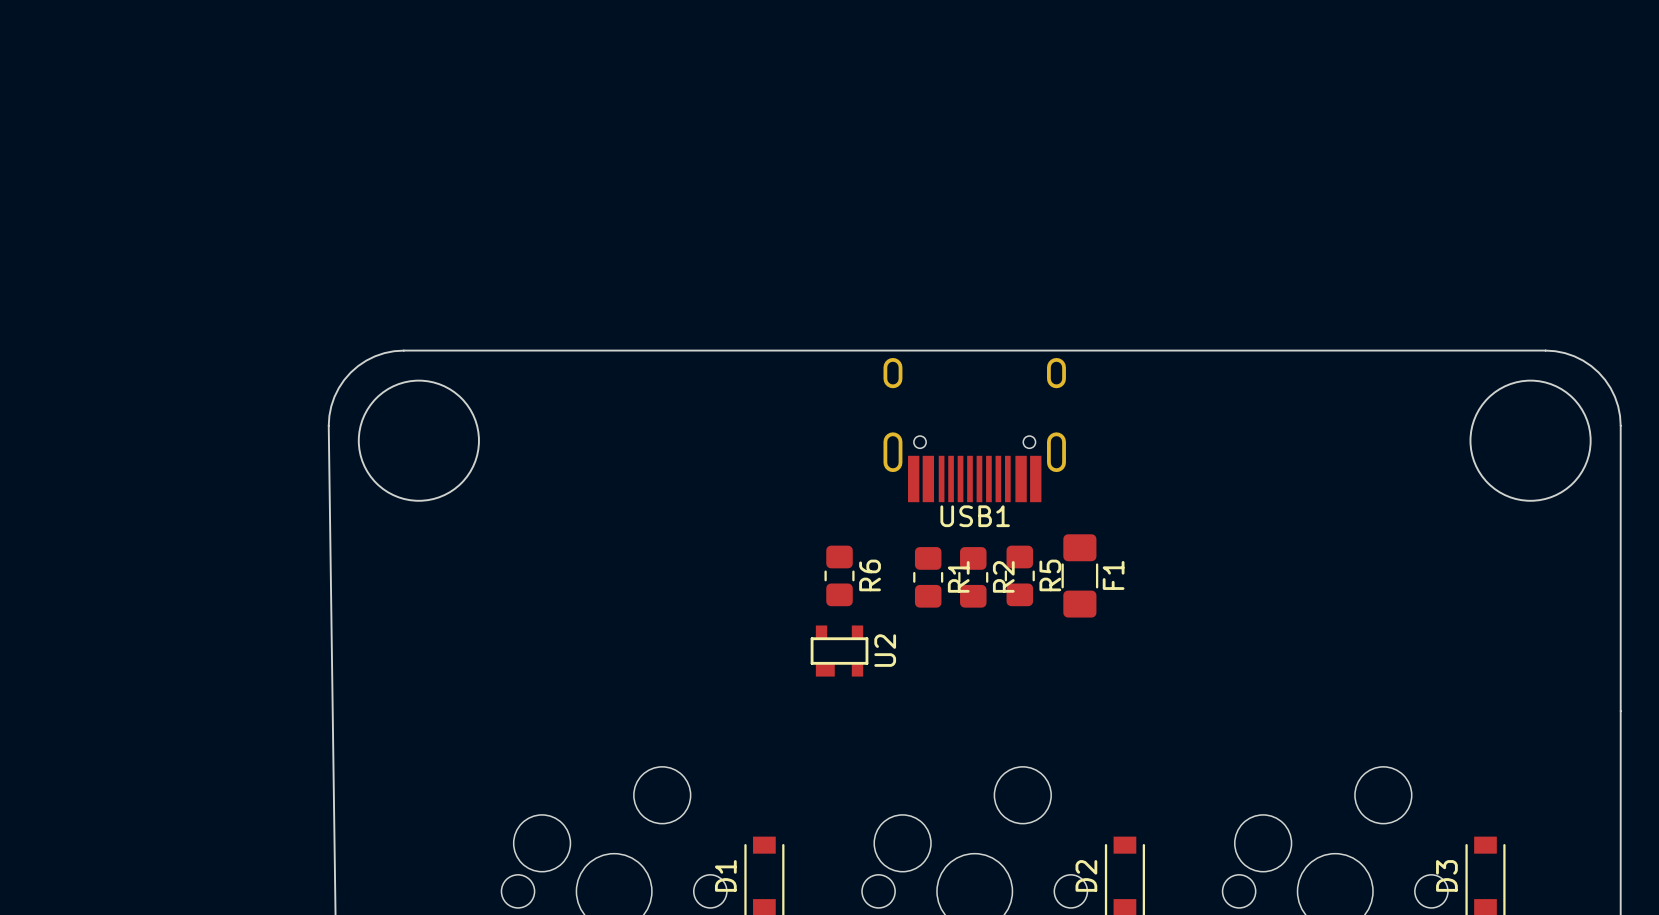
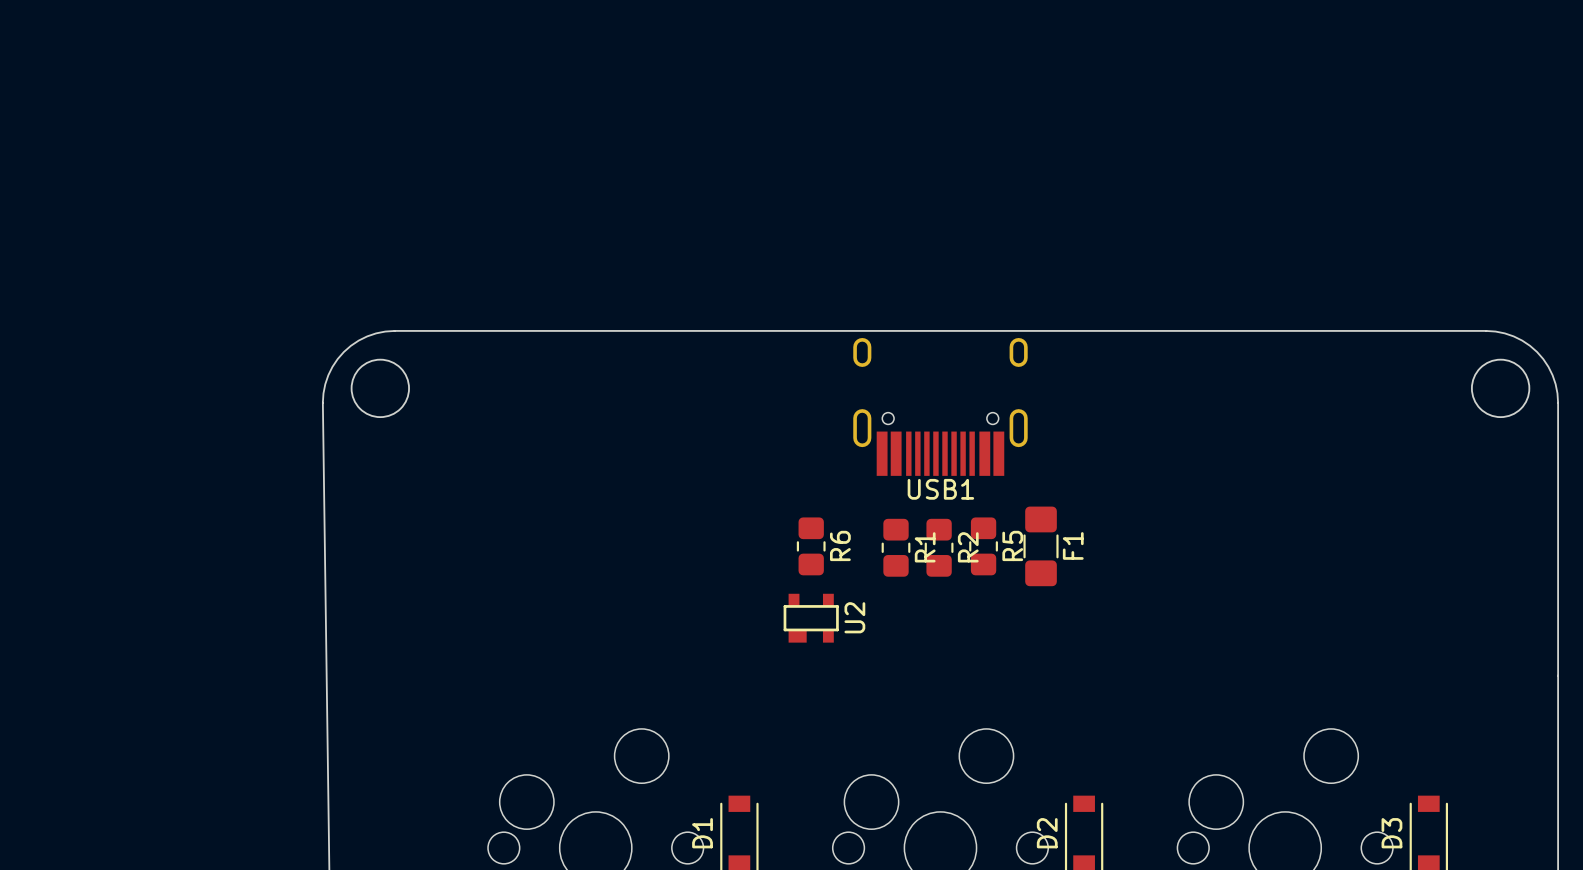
round board edge: [357, 379, 480, 502] -> none
round board edge: none -> [350, 358, 410, 419]
round board edge: [1469, 379, 1592, 502] -> none
round board edge: none -> [1471, 358, 1531, 419]

